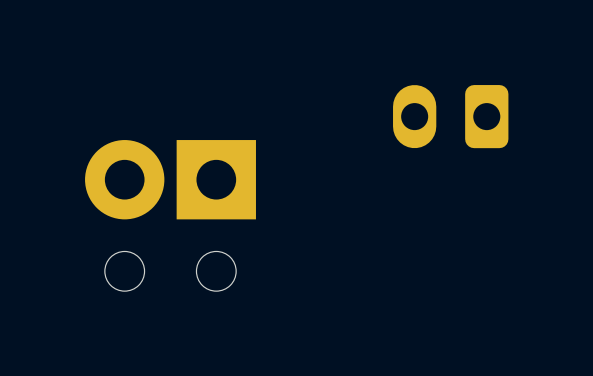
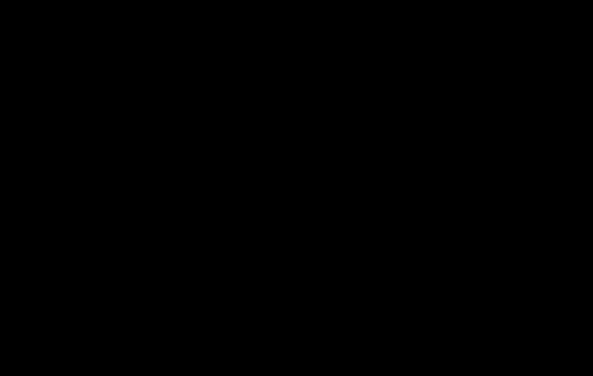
part: (450, 116) -> none
part: (170, 215) -> none

